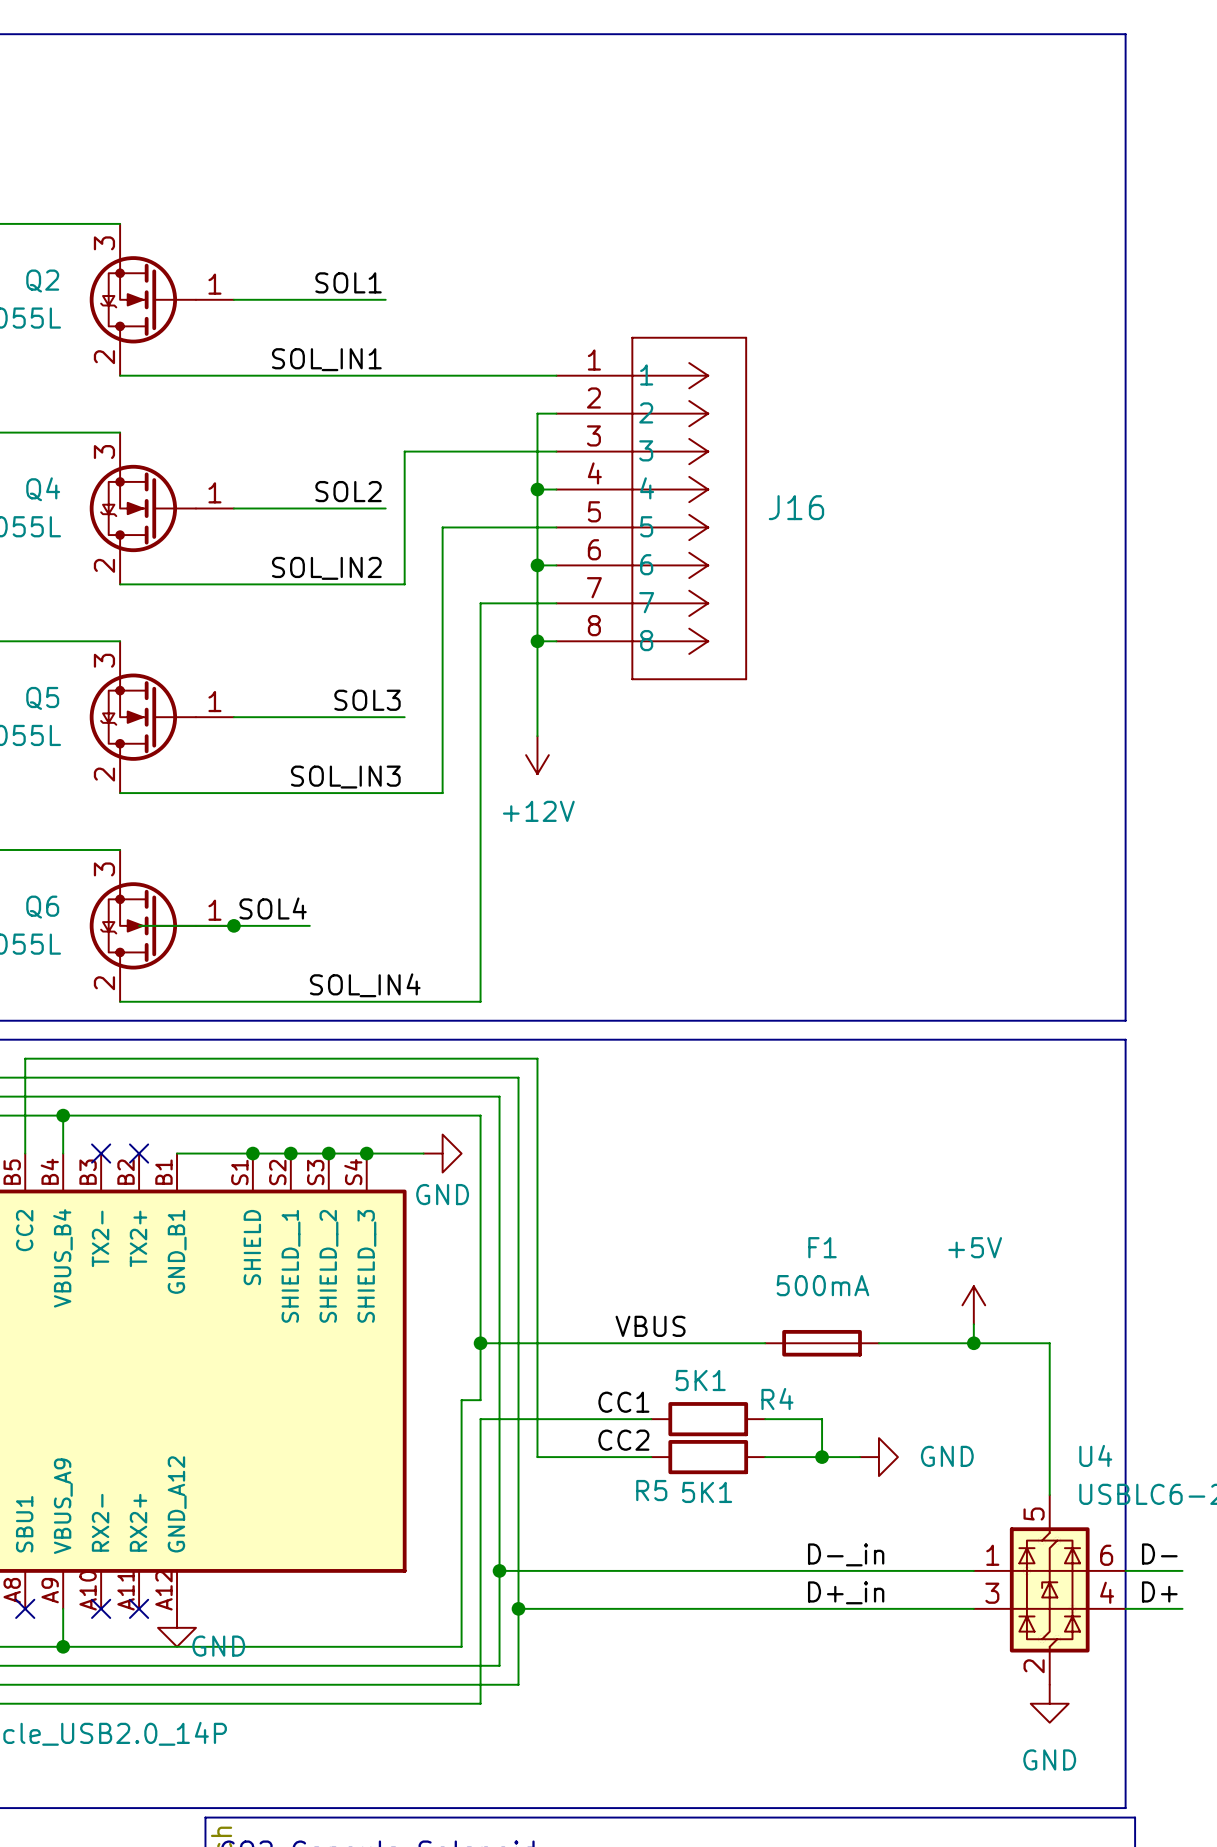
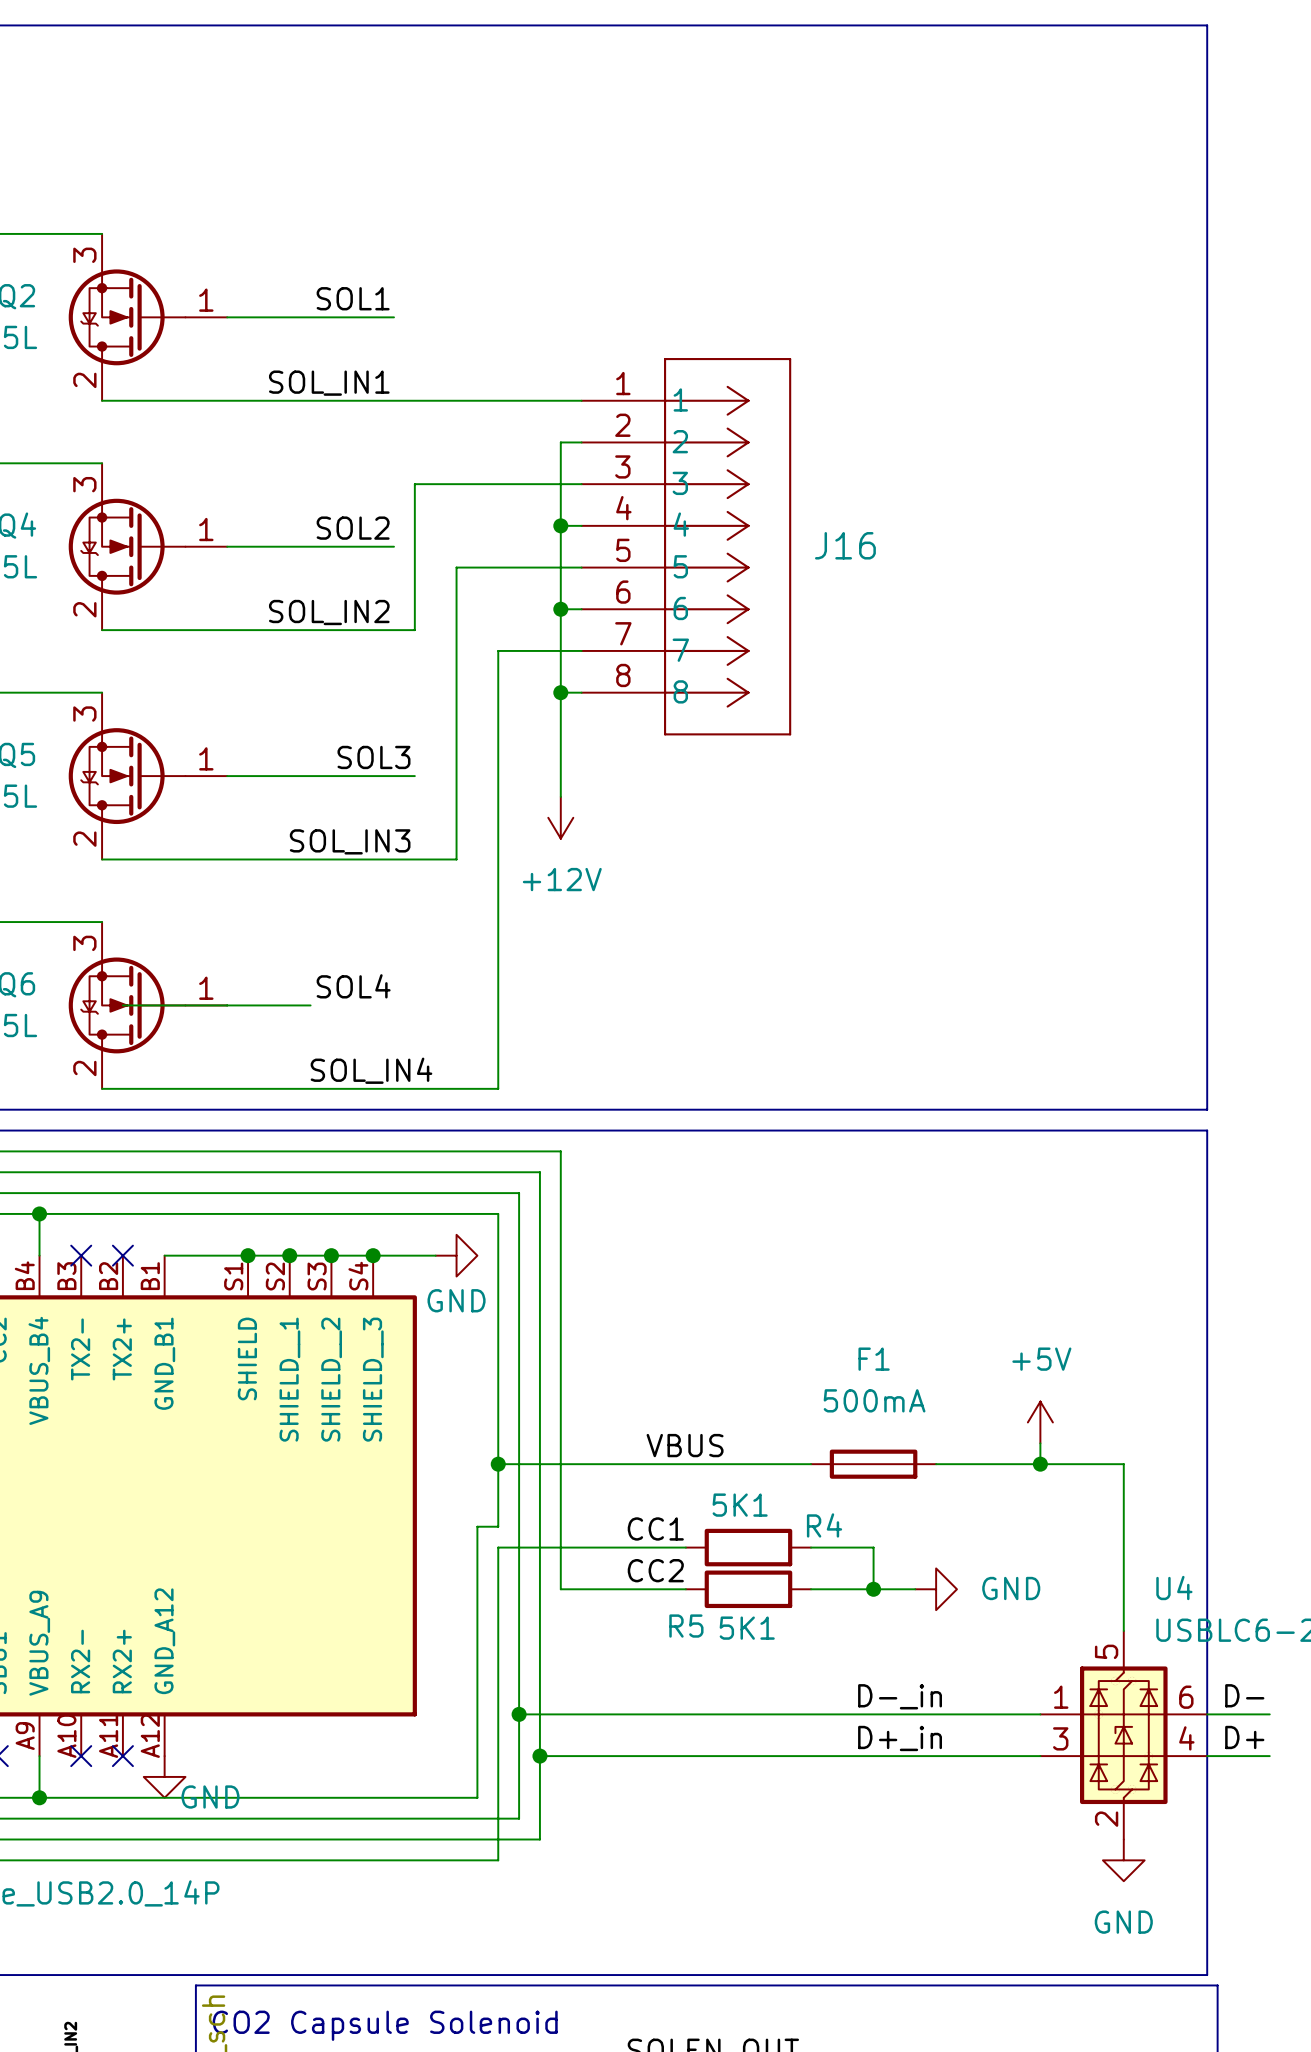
label position: SOL4 (273, 908) -> SOL4 (353, 986)
junction: (233, 925) -> none

